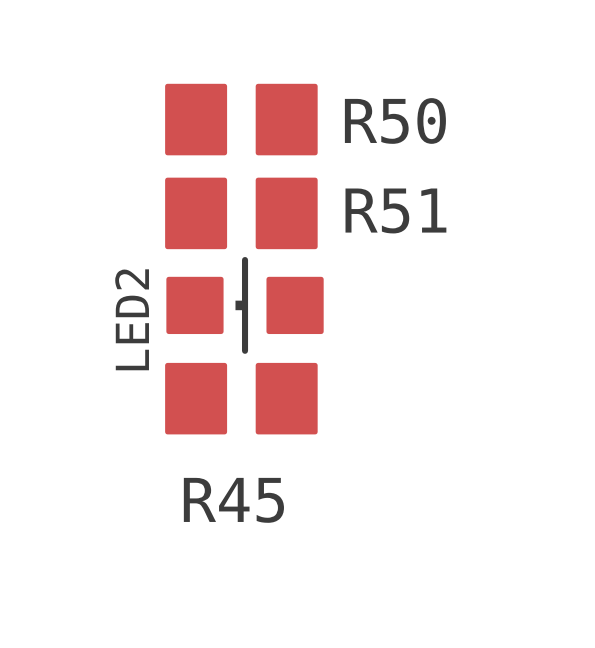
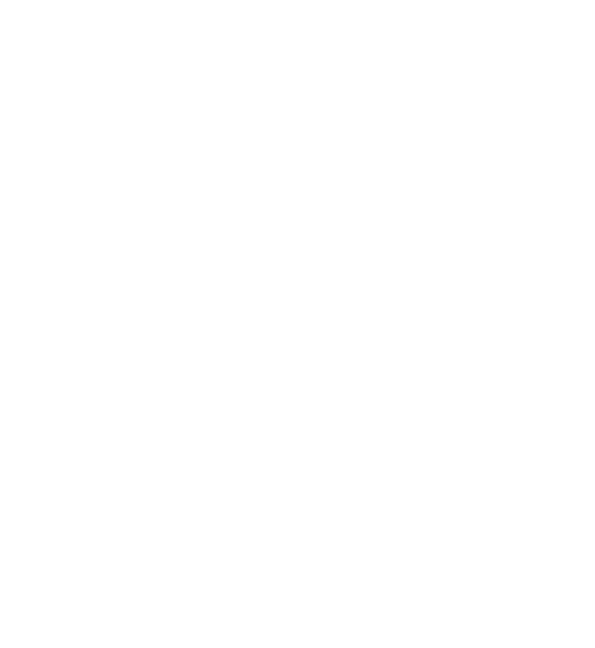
R50: (241, 119) -> none
R51: (241, 213) -> none
LED2: (245, 305) -> none
R45: (241, 398) -> none

